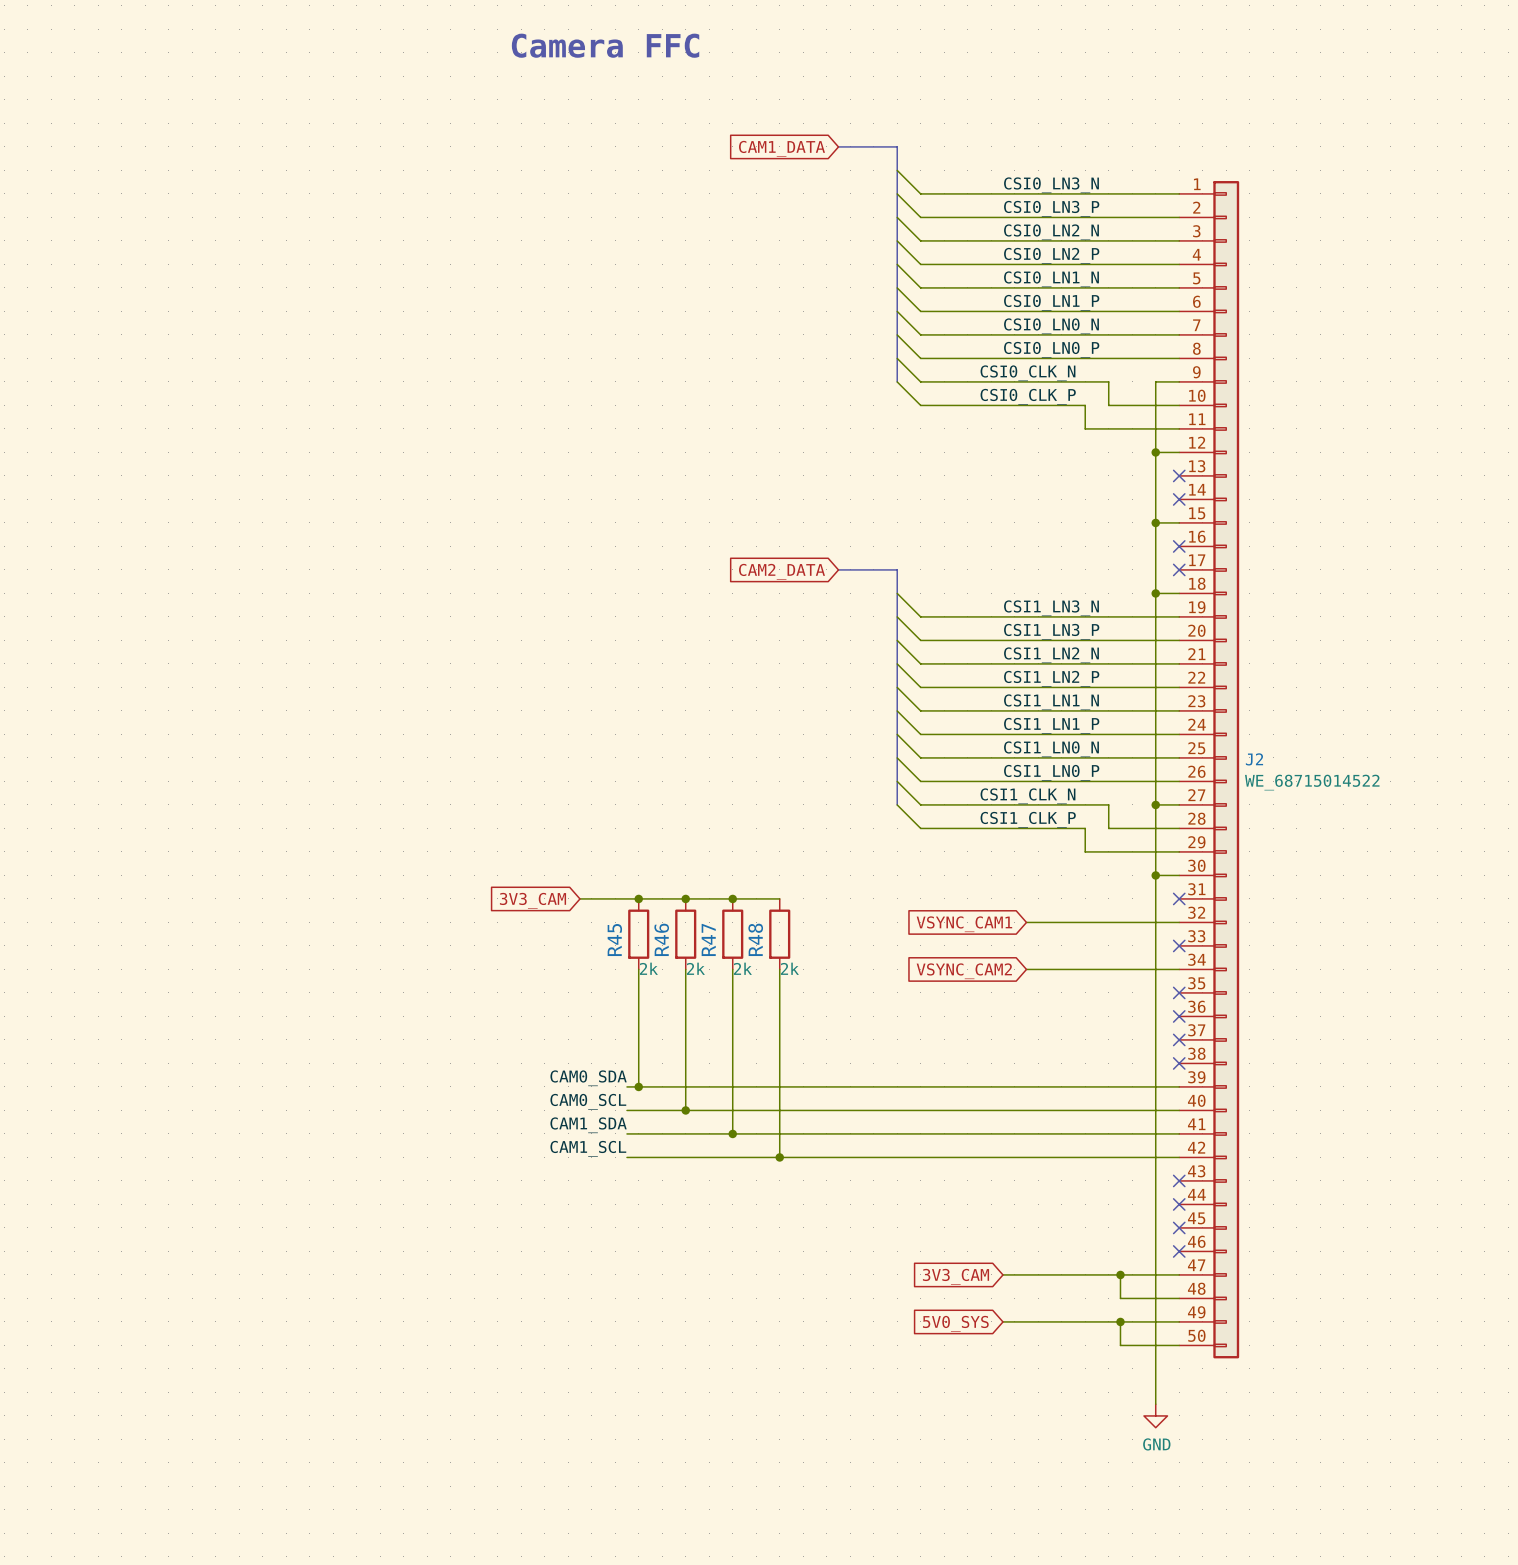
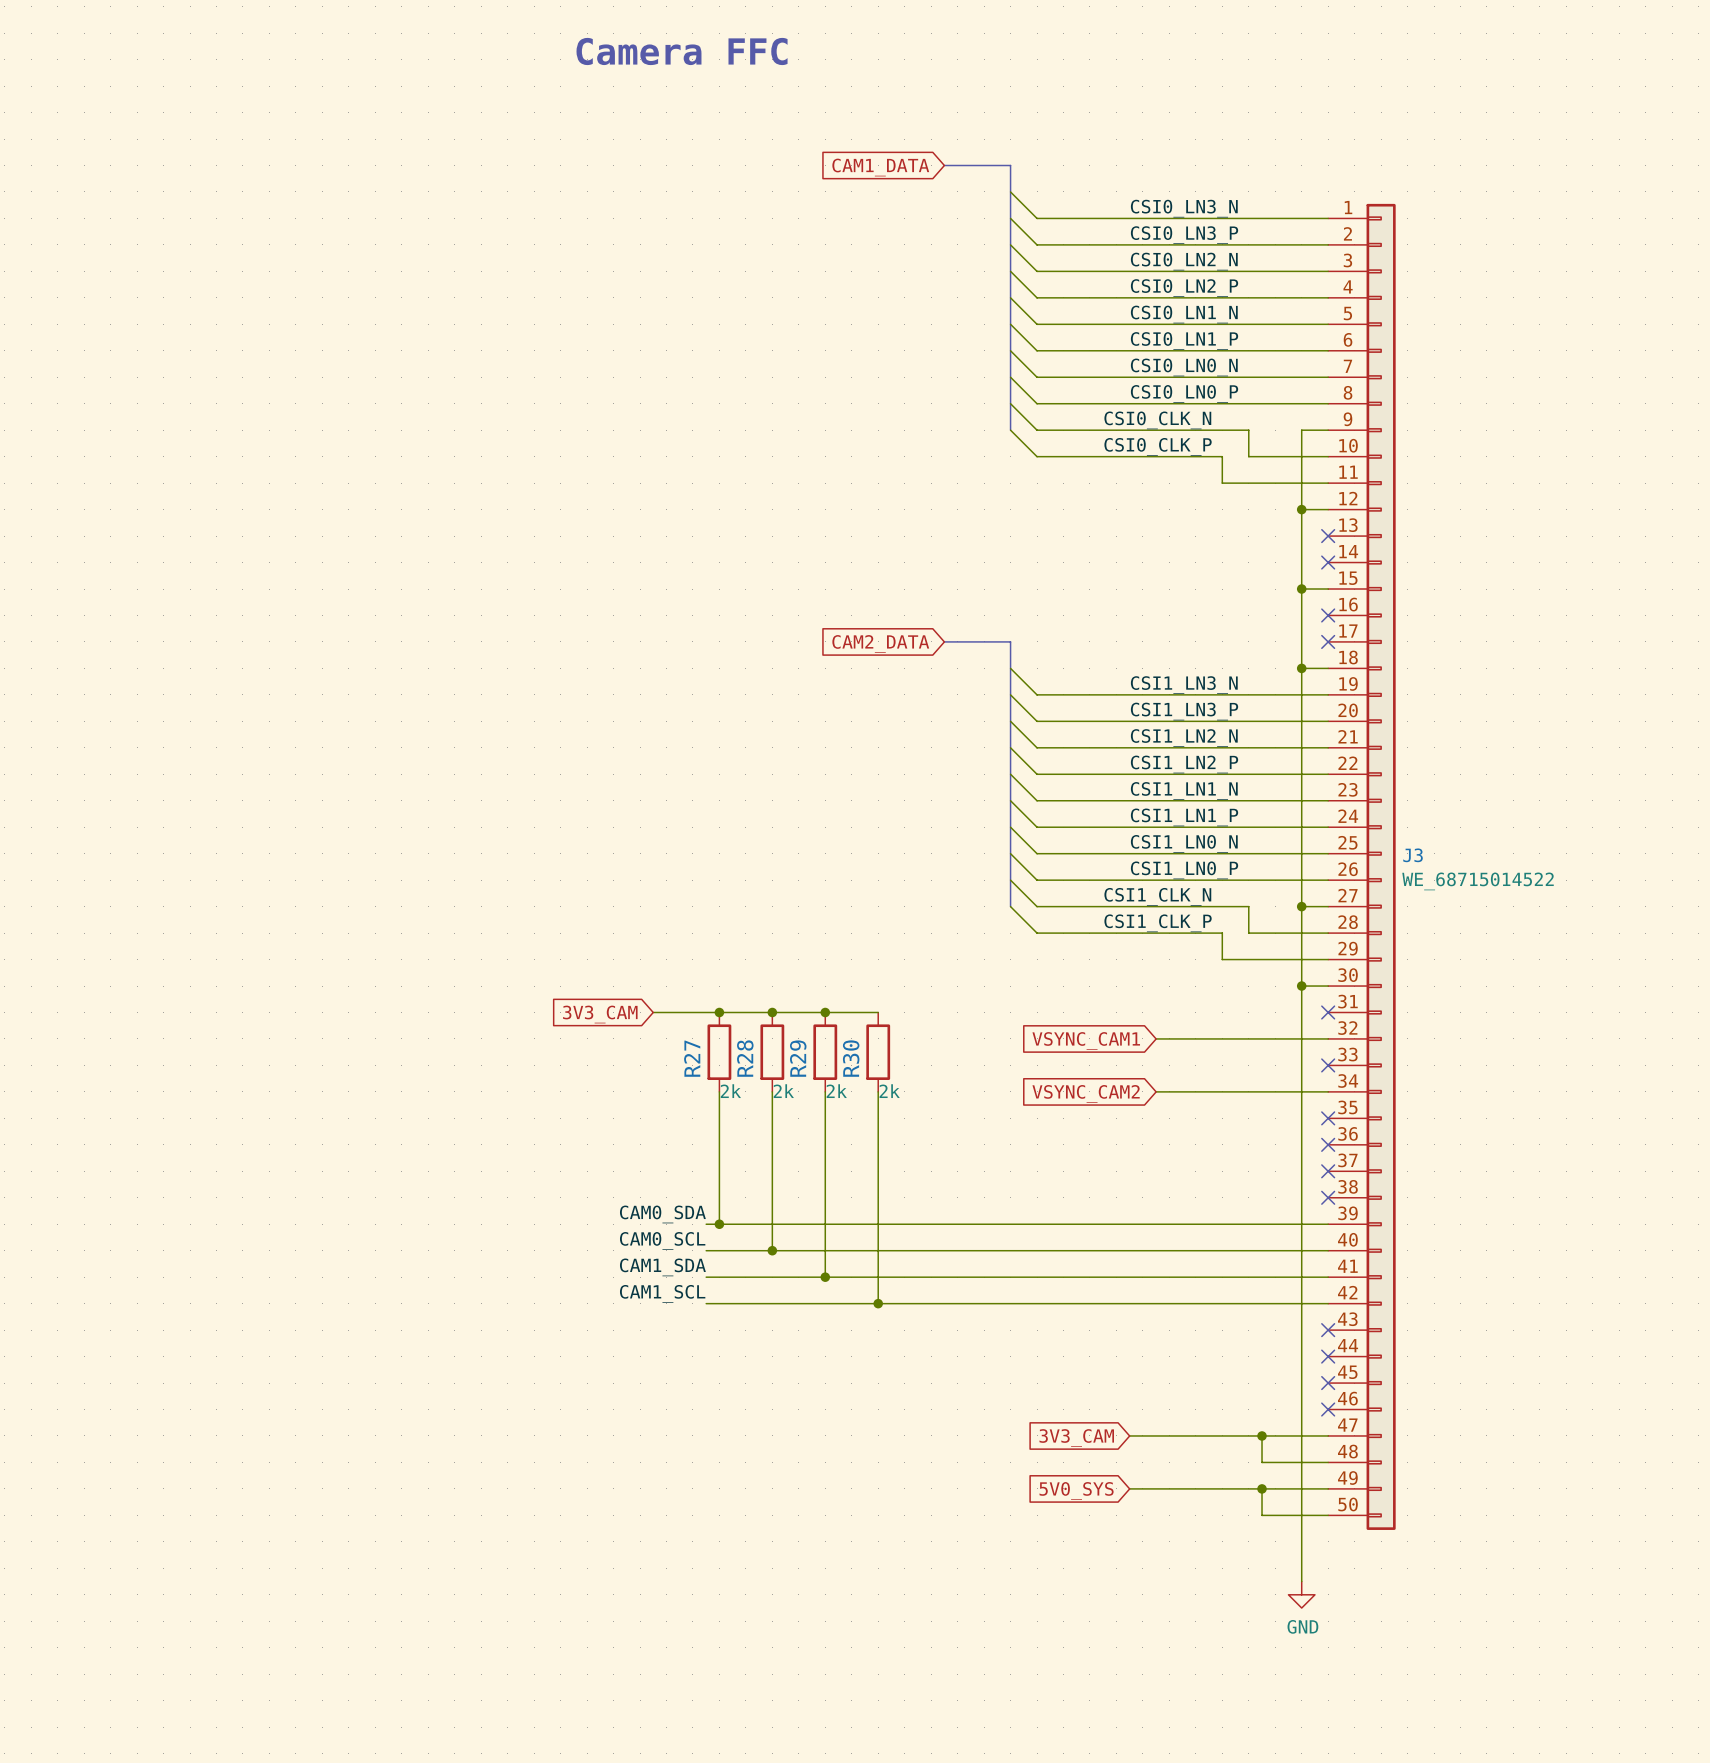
J2 name: J2 (1254, 759) -> J3 (1413, 855)
R46 name: R46 (661, 939) -> R28 (745, 1058)
R47 name: R47 (708, 939) -> R29 (798, 1058)
R48 name: R48 (755, 939) -> R30 (851, 1058)
R45 name: R45 (614, 940) -> R27 (692, 1058)

